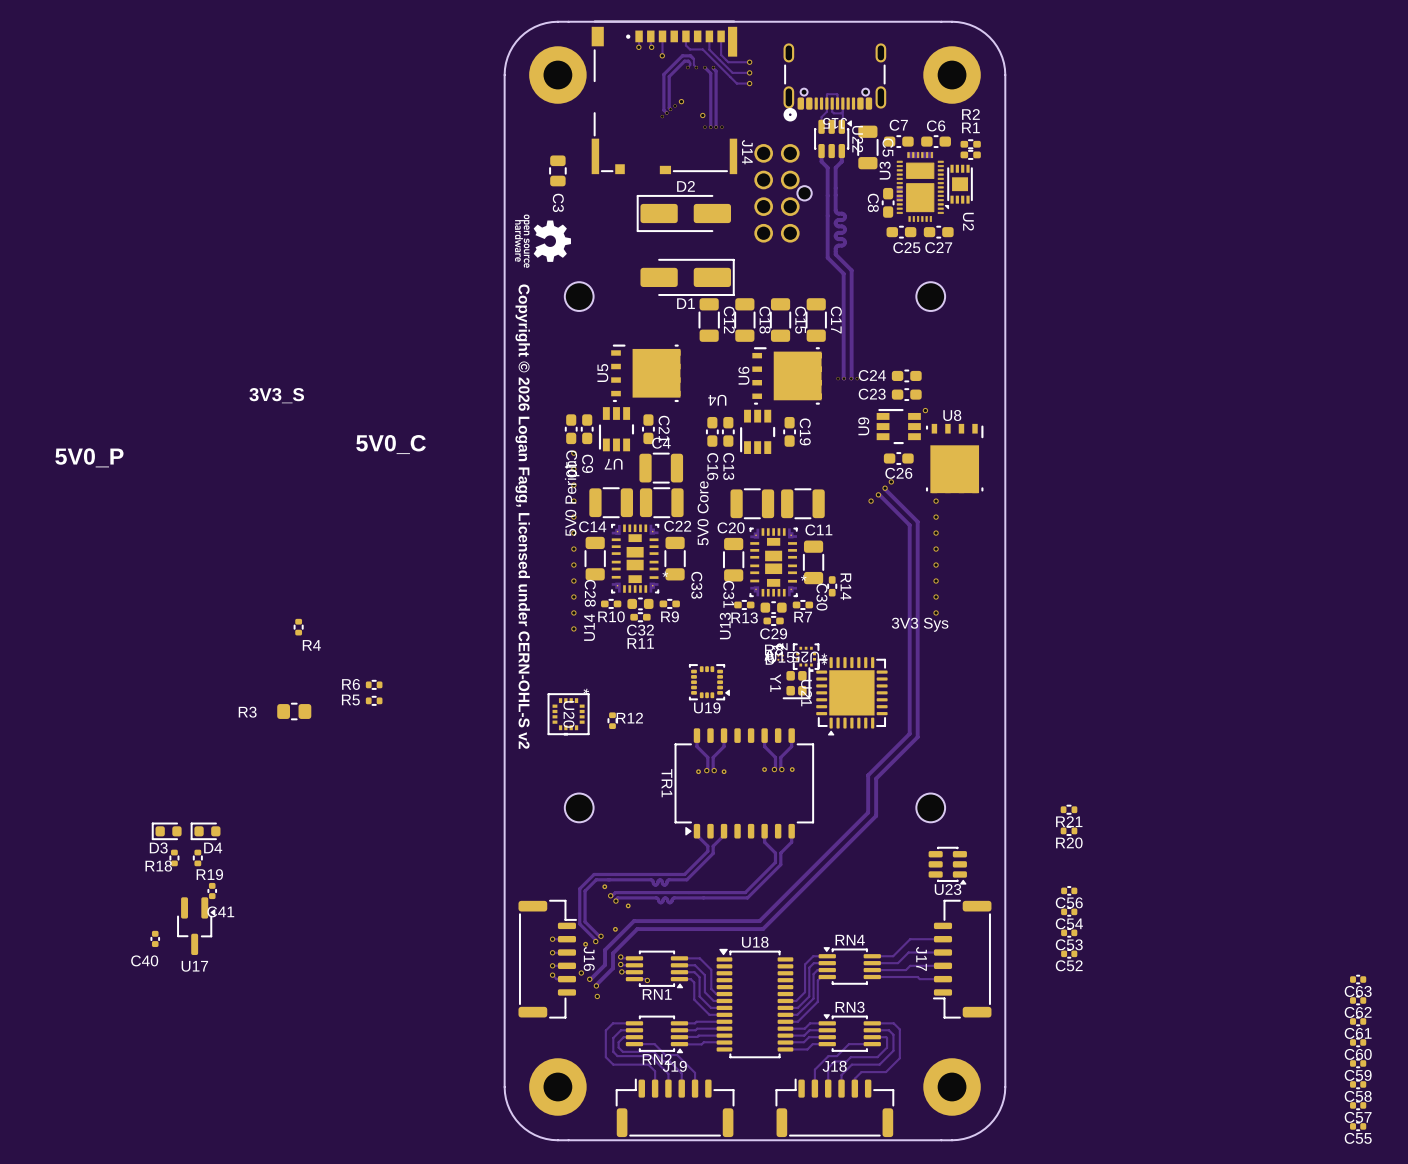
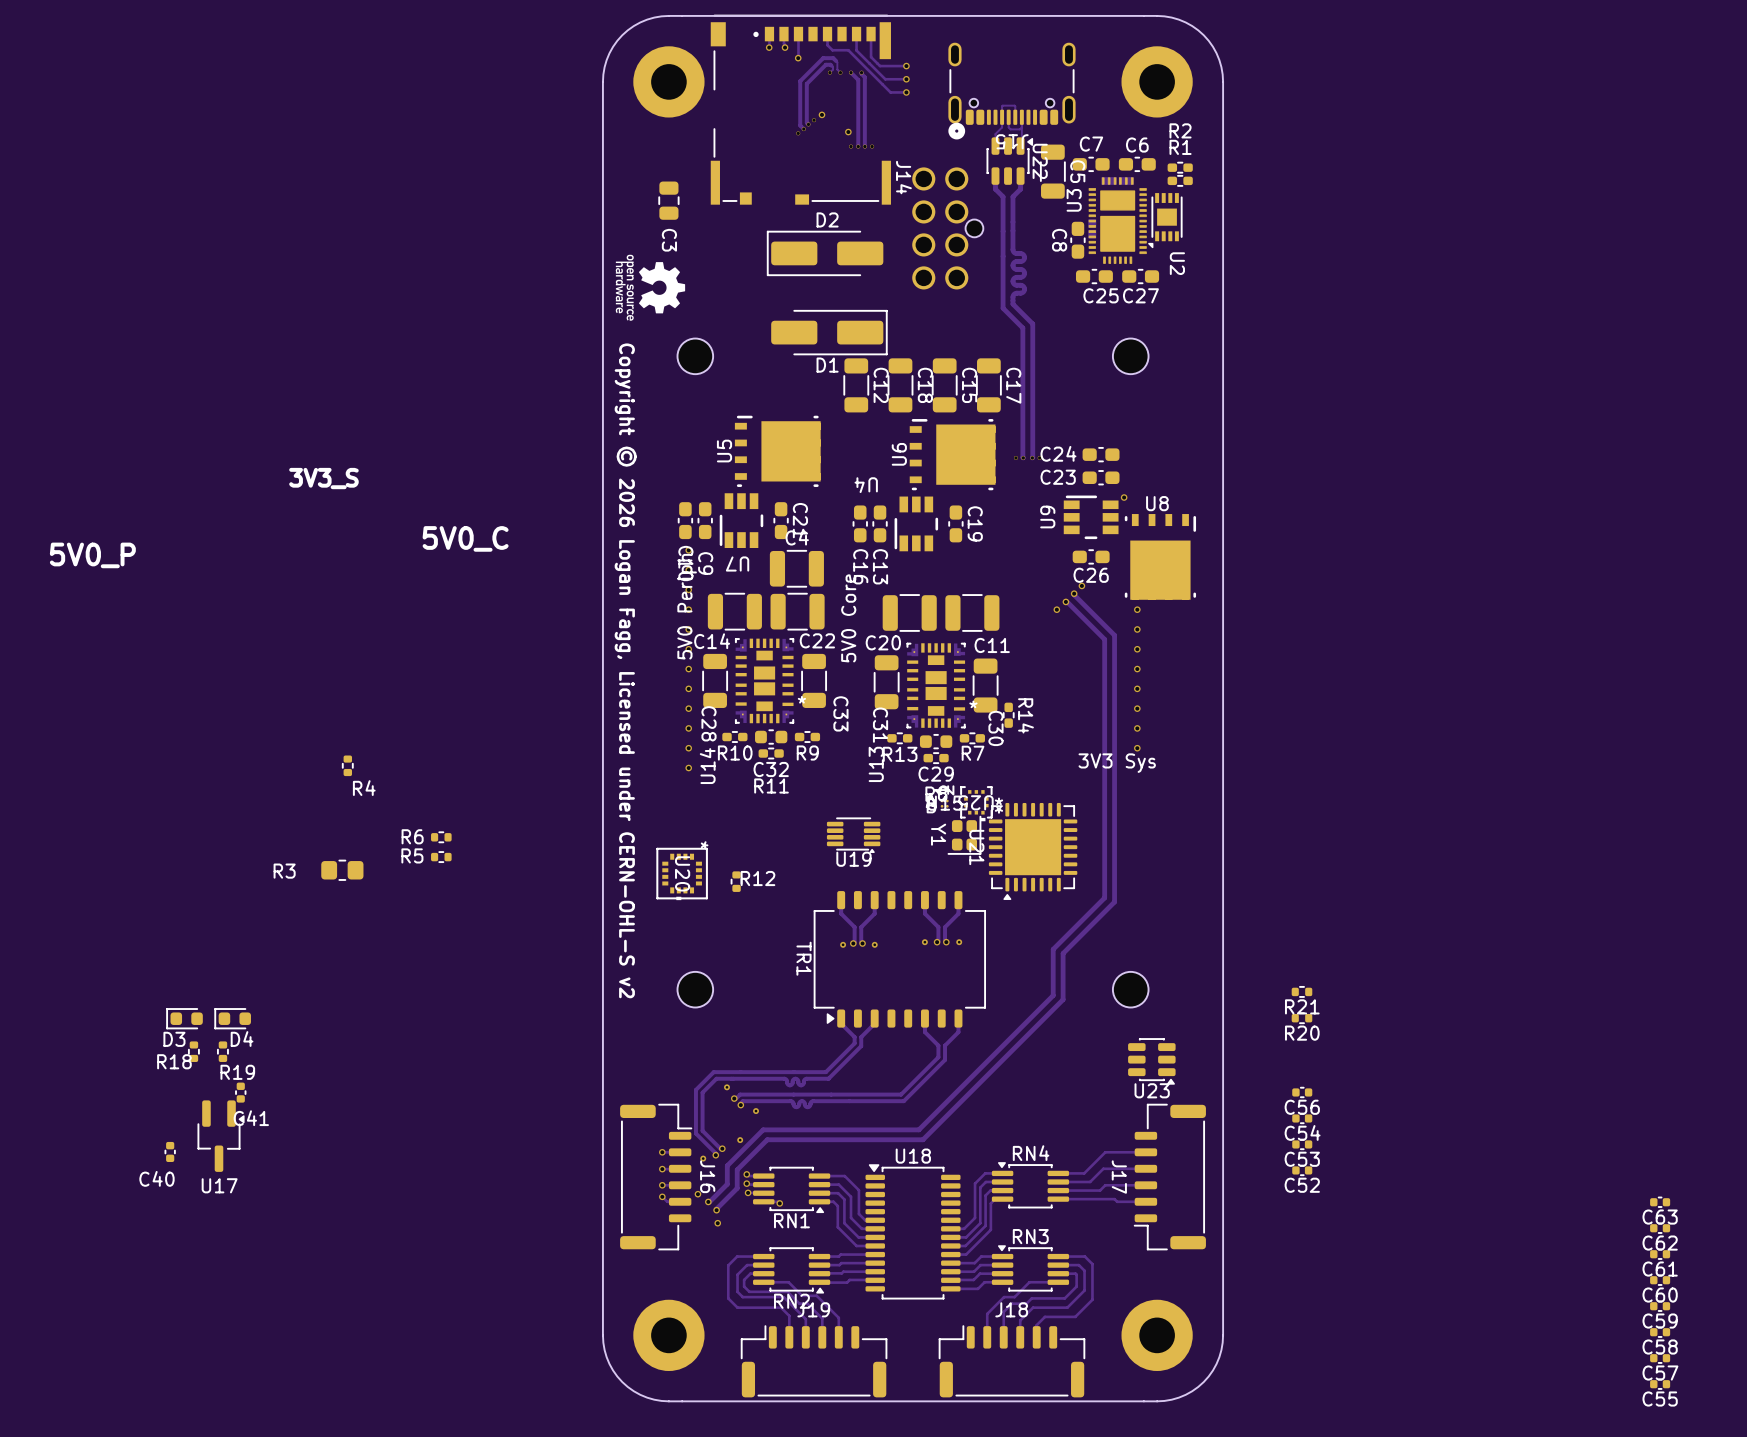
U19 footprint: [689, 664, 730, 700] -> [826, 817, 881, 853]

